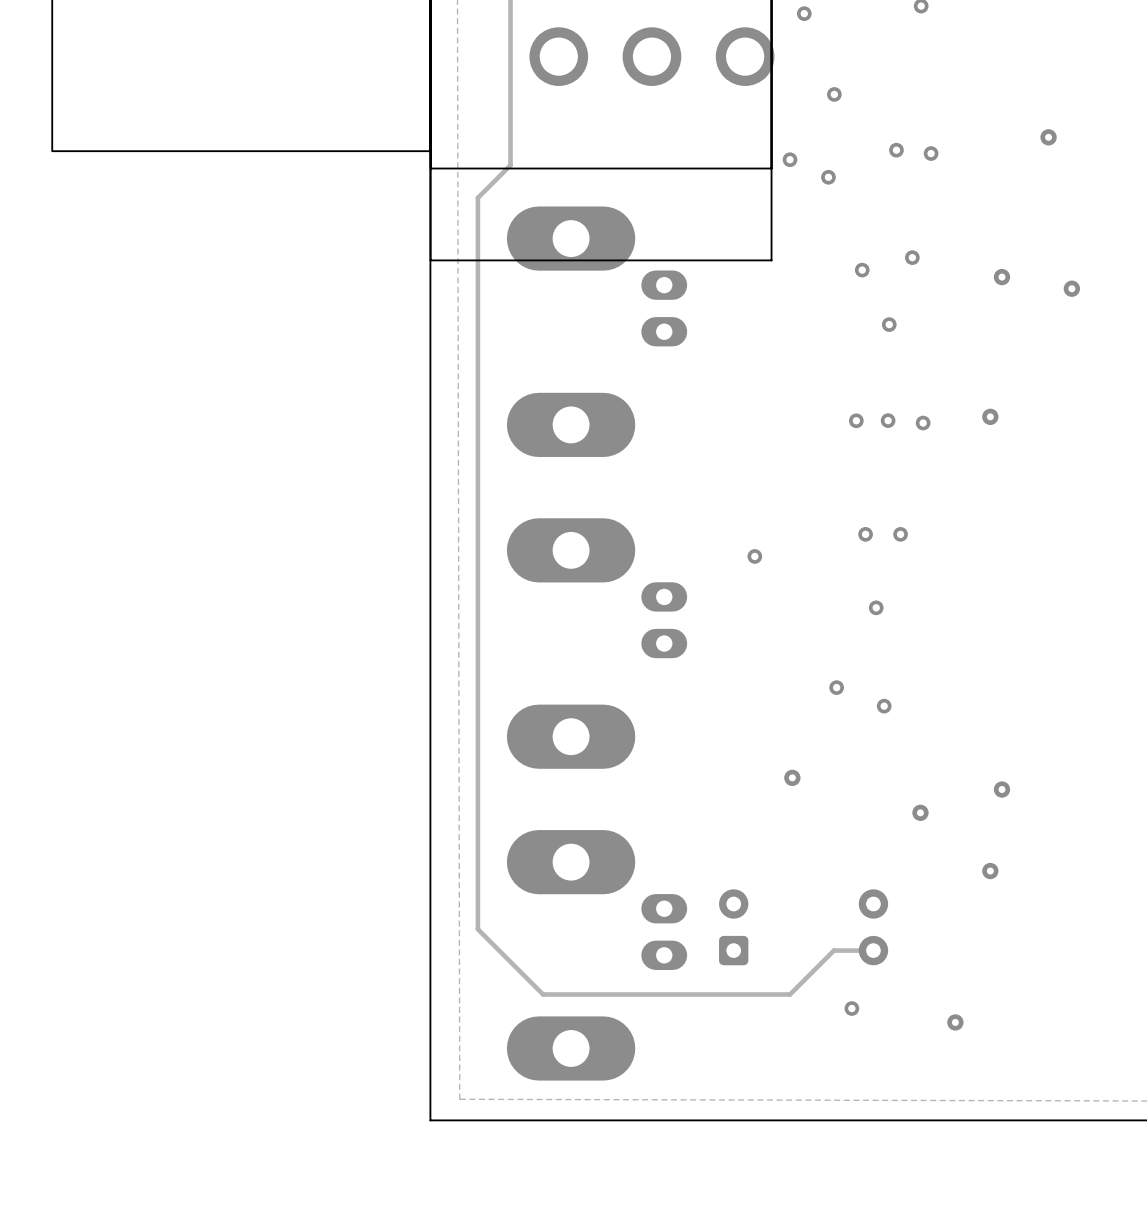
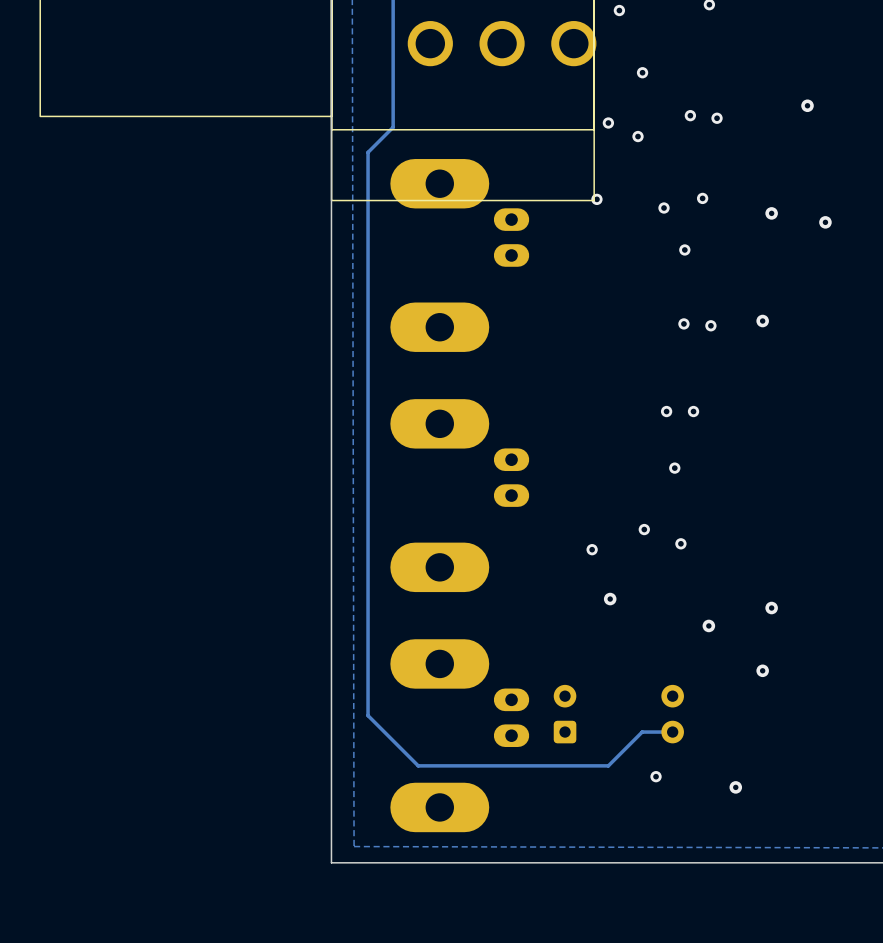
via: none -> (596, 199)
via: (856, 420) -> none
via: (754, 556) -> none
via: none -> (592, 549)

